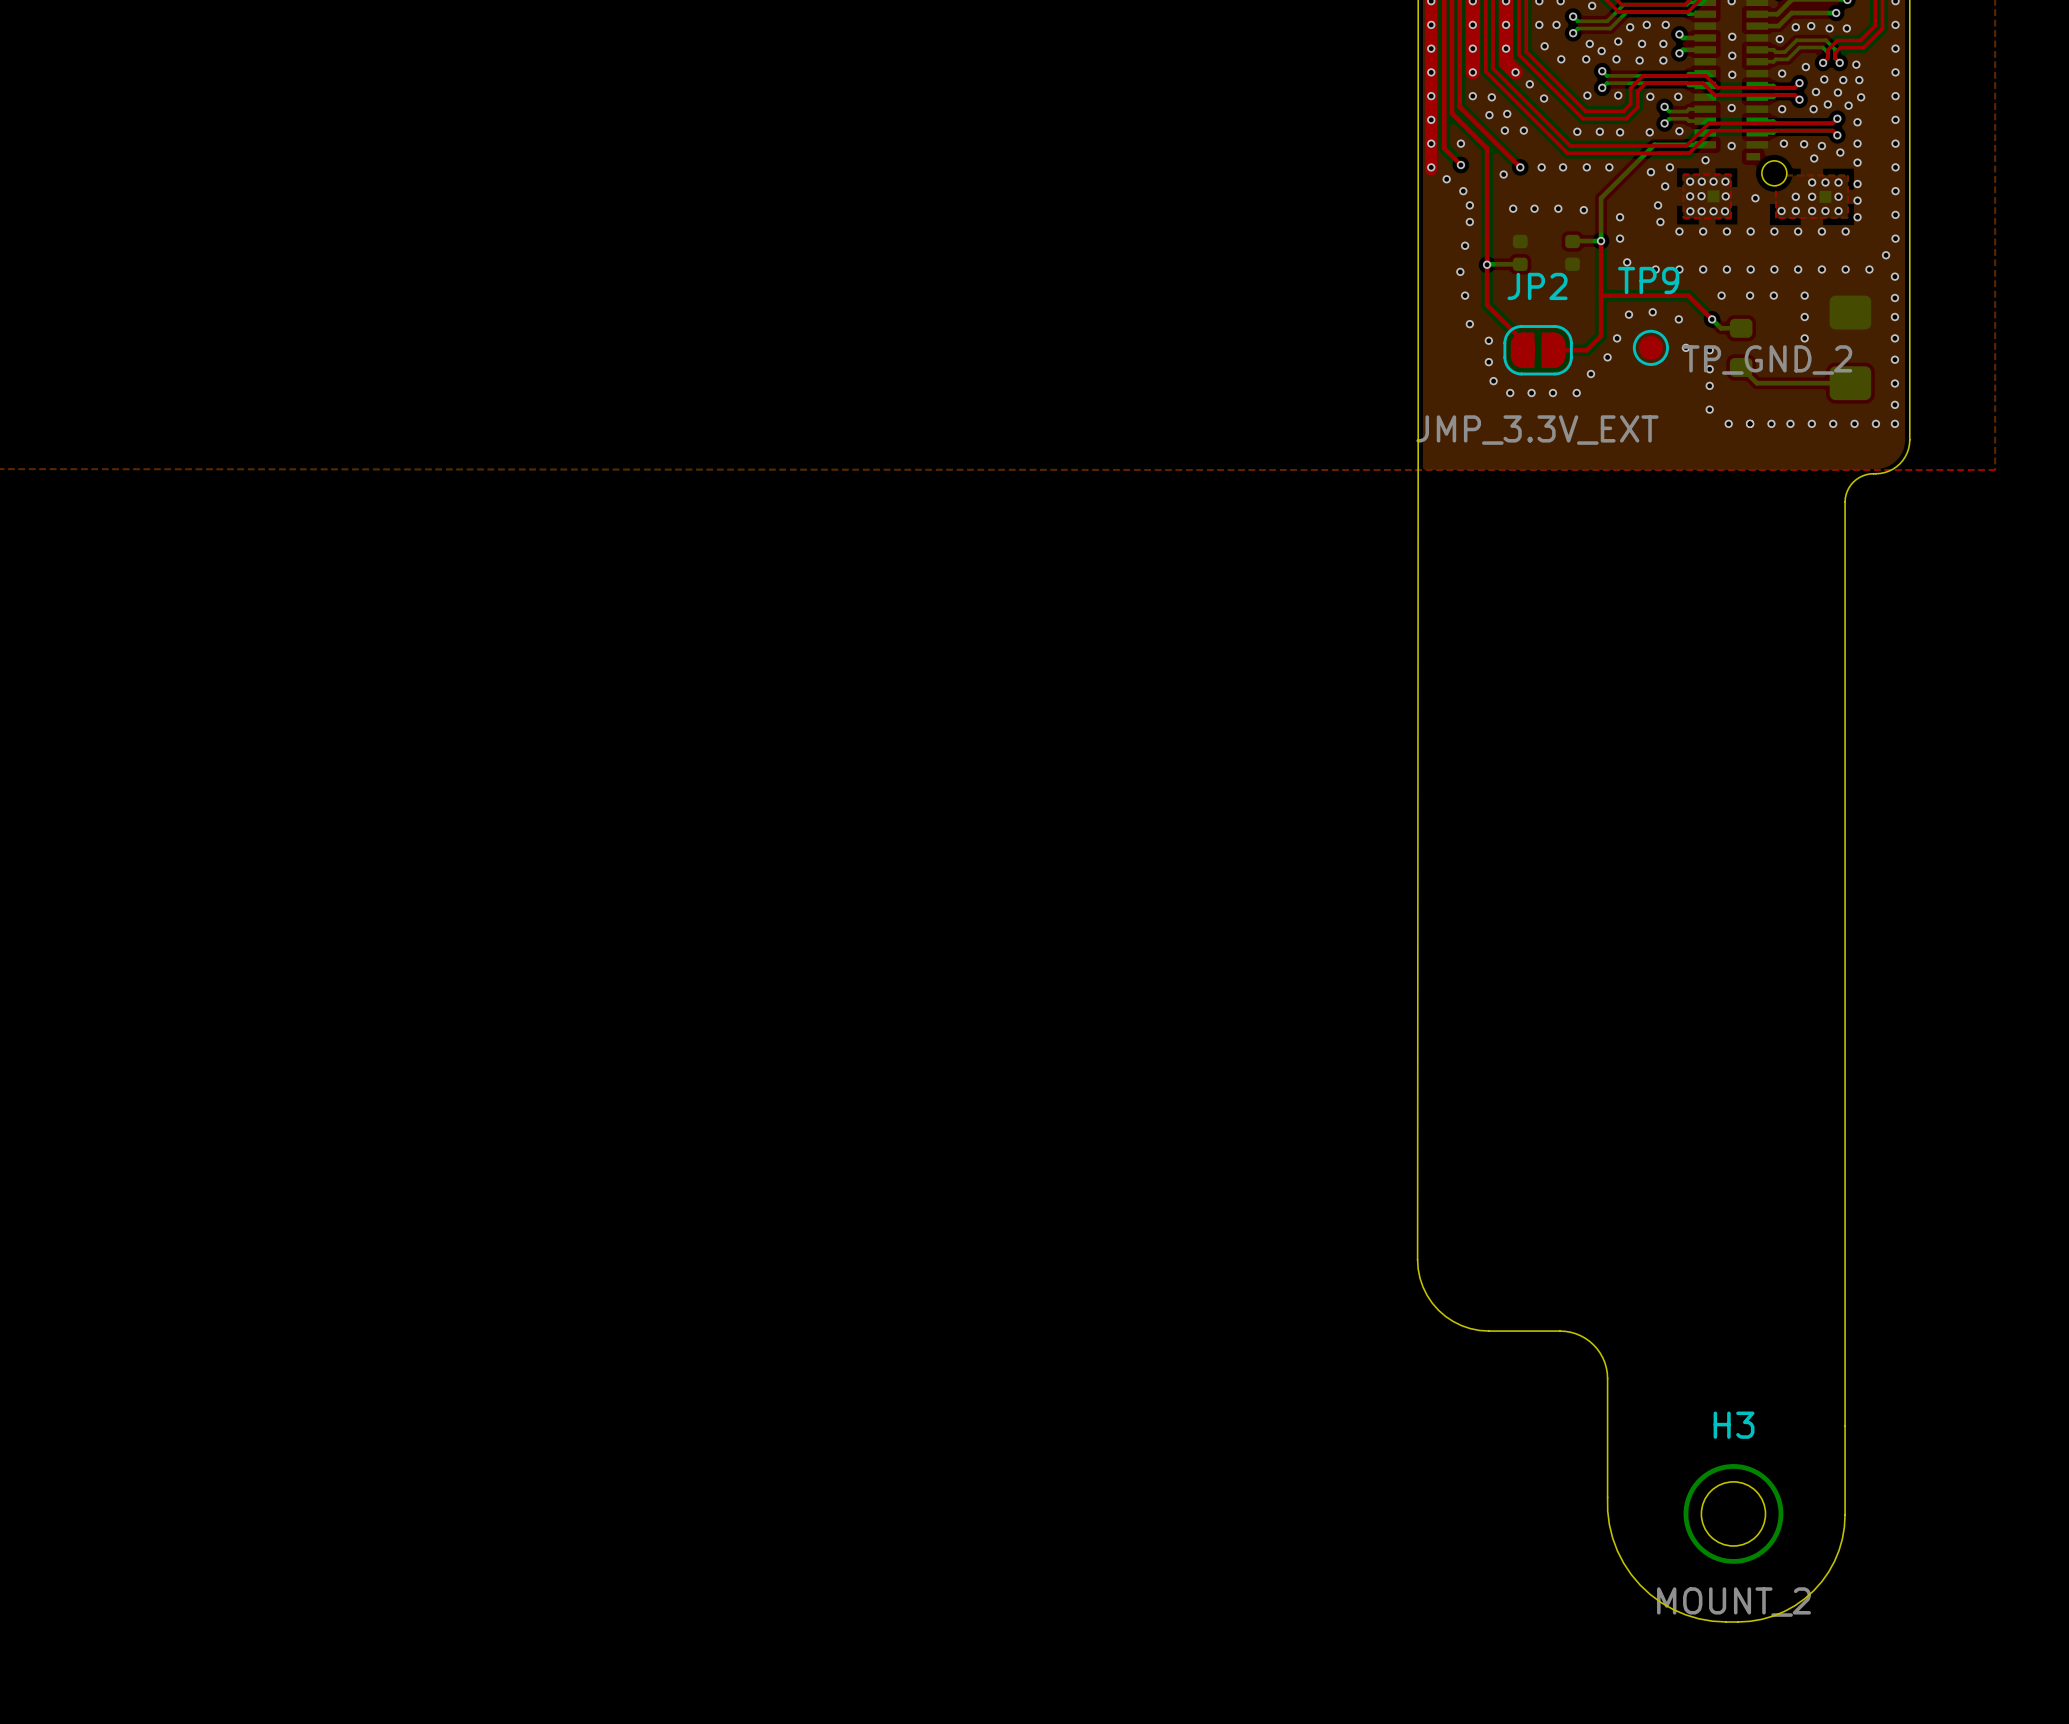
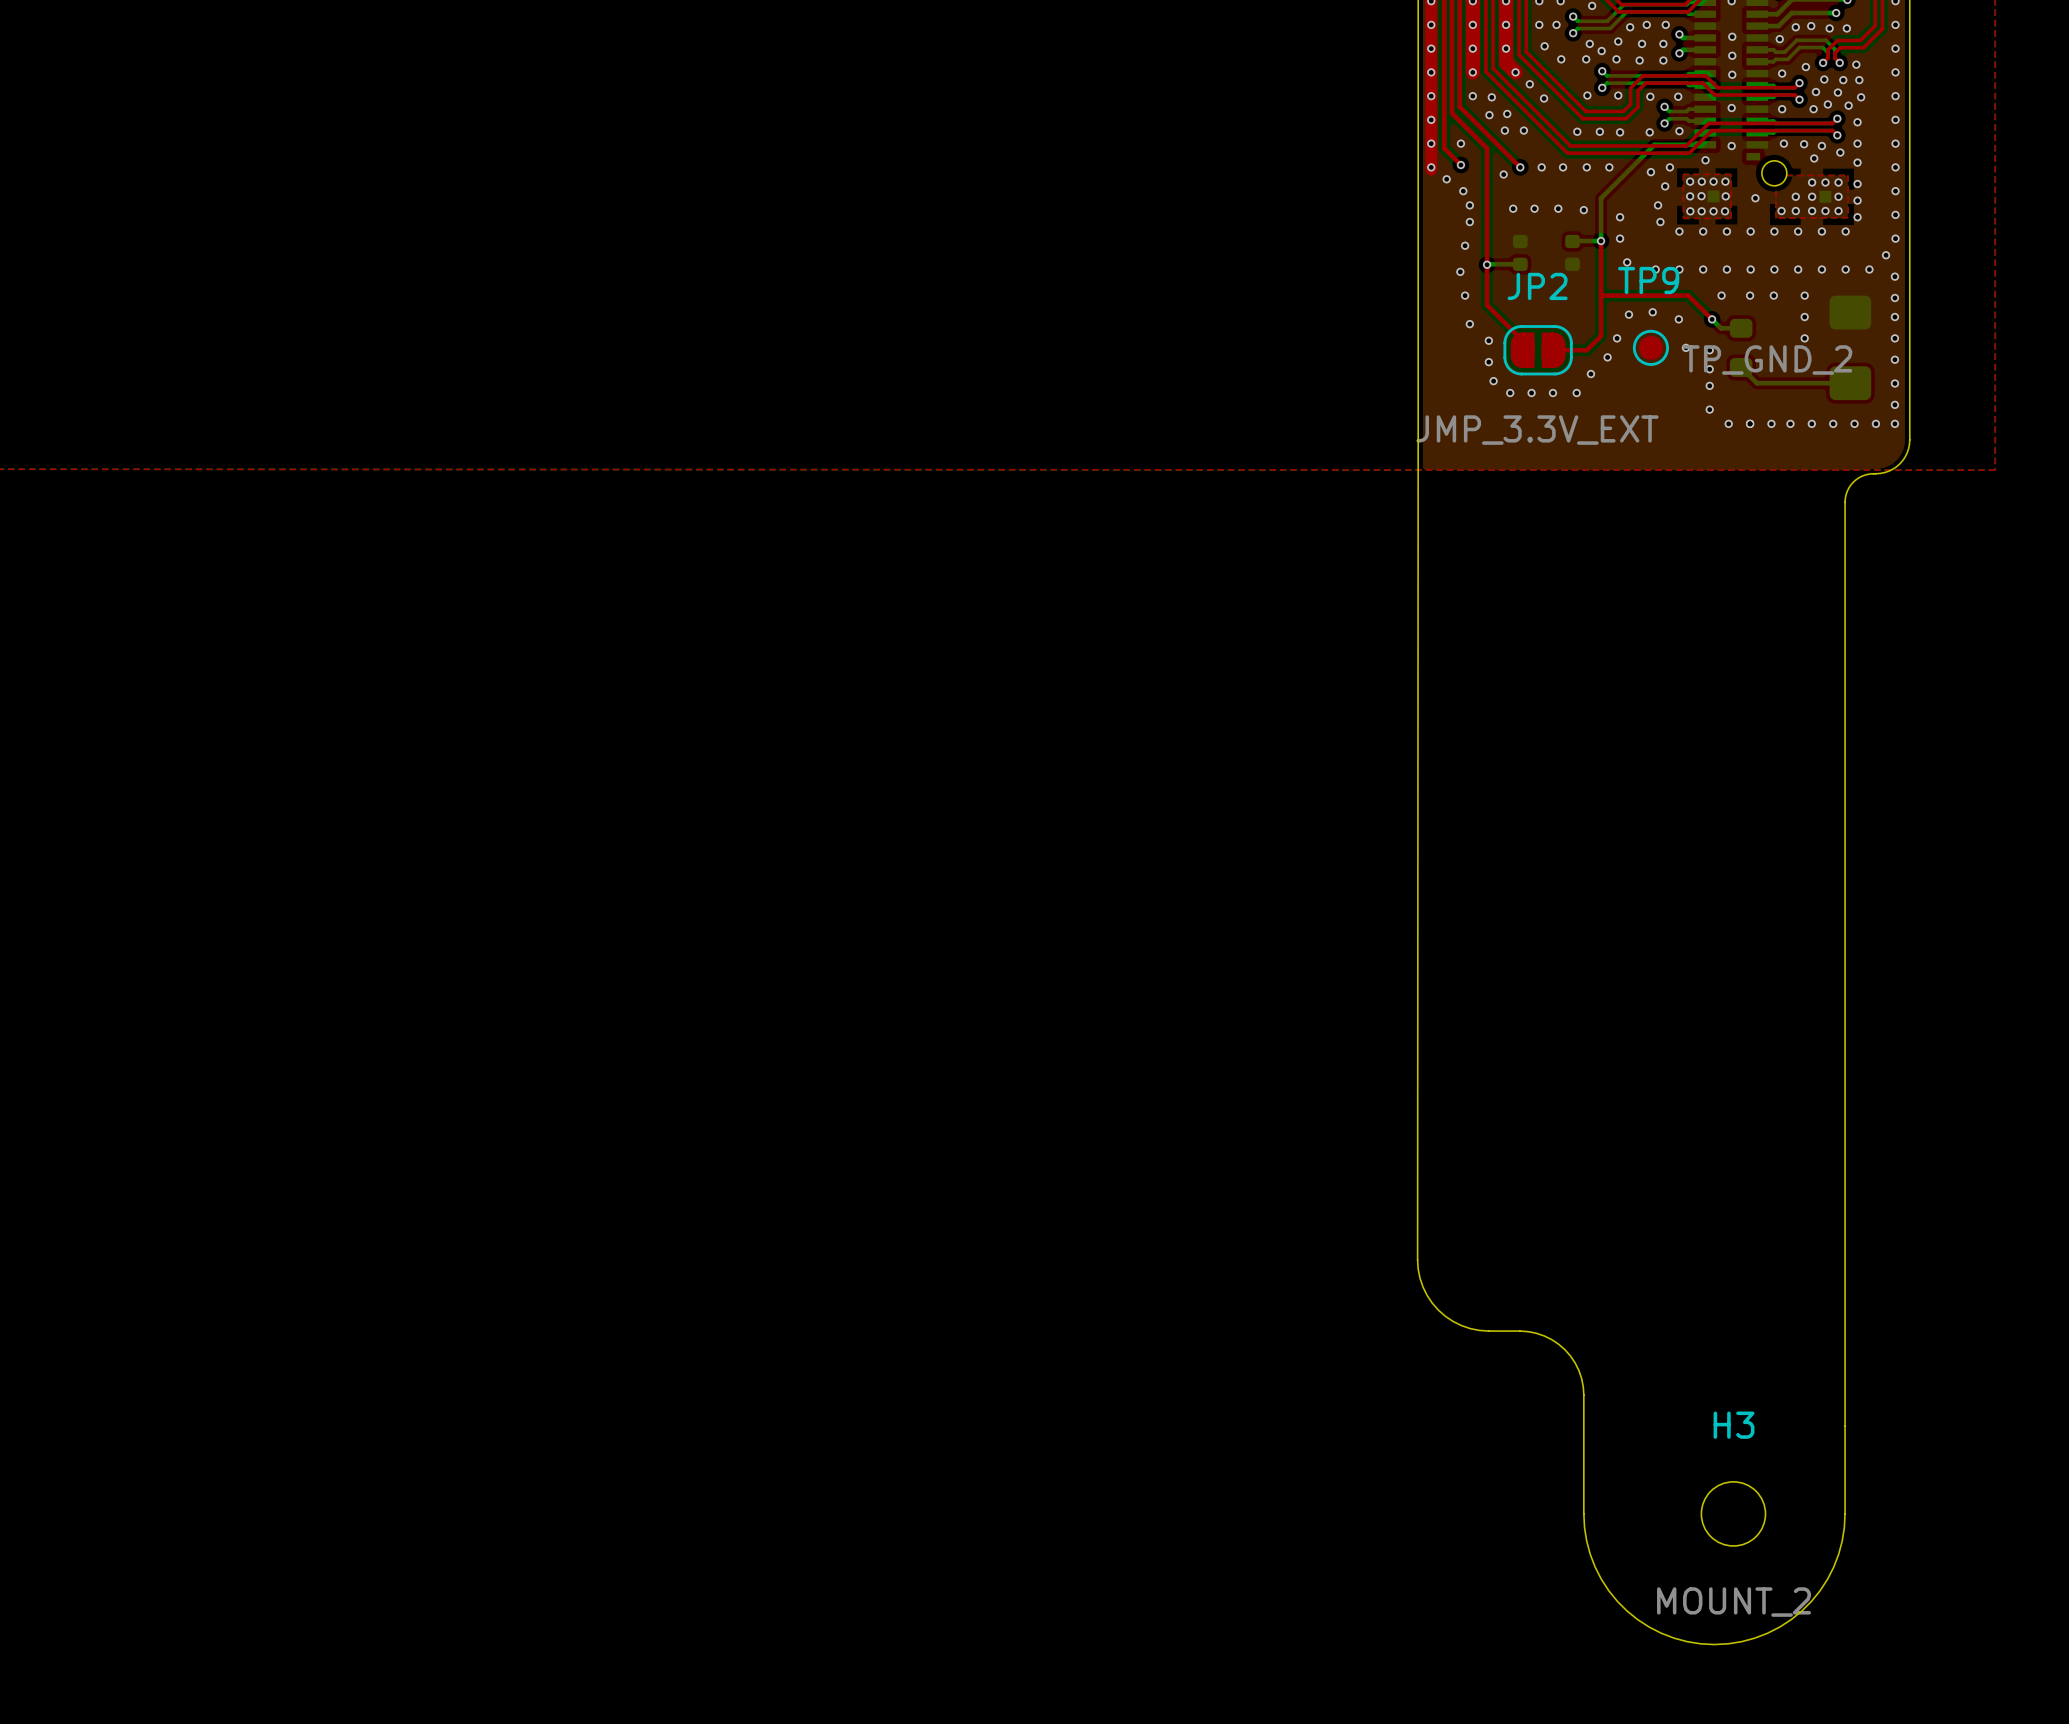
board edge: (1519, 1331) (1570, 1332) (1585, 1338) (1597, 1348) (1604, 1362) (1607, 1373) (1607, 1511) (1609, 1524) (1617, 1550) (1631, 1574) (1650, 1594) (1661, 1602) (1685, 1614) (1712, 1621) (1726, 1621) -> (1519, 1331) (1536, 1333) (1551, 1339) (1570, 1356) (1578, 1370) (1583, 1395) (1584, 1527) (1590, 1554) (1601, 1579) (1617, 1601) (1649, 1627) (1674, 1638) (1714, 1644) (1754, 1638) (1779, 1627) (1811, 1601) (1827, 1579) (1842, 1541) (1845, 1513)
drawing: [1683, 1464, 1784, 1564] -> none
board edge: (1845, 1513) (1839, 1550) (1828, 1571) (1813, 1590) (1795, 1605) (1773, 1615) (1750, 1621) (1726, 1621) -> none

